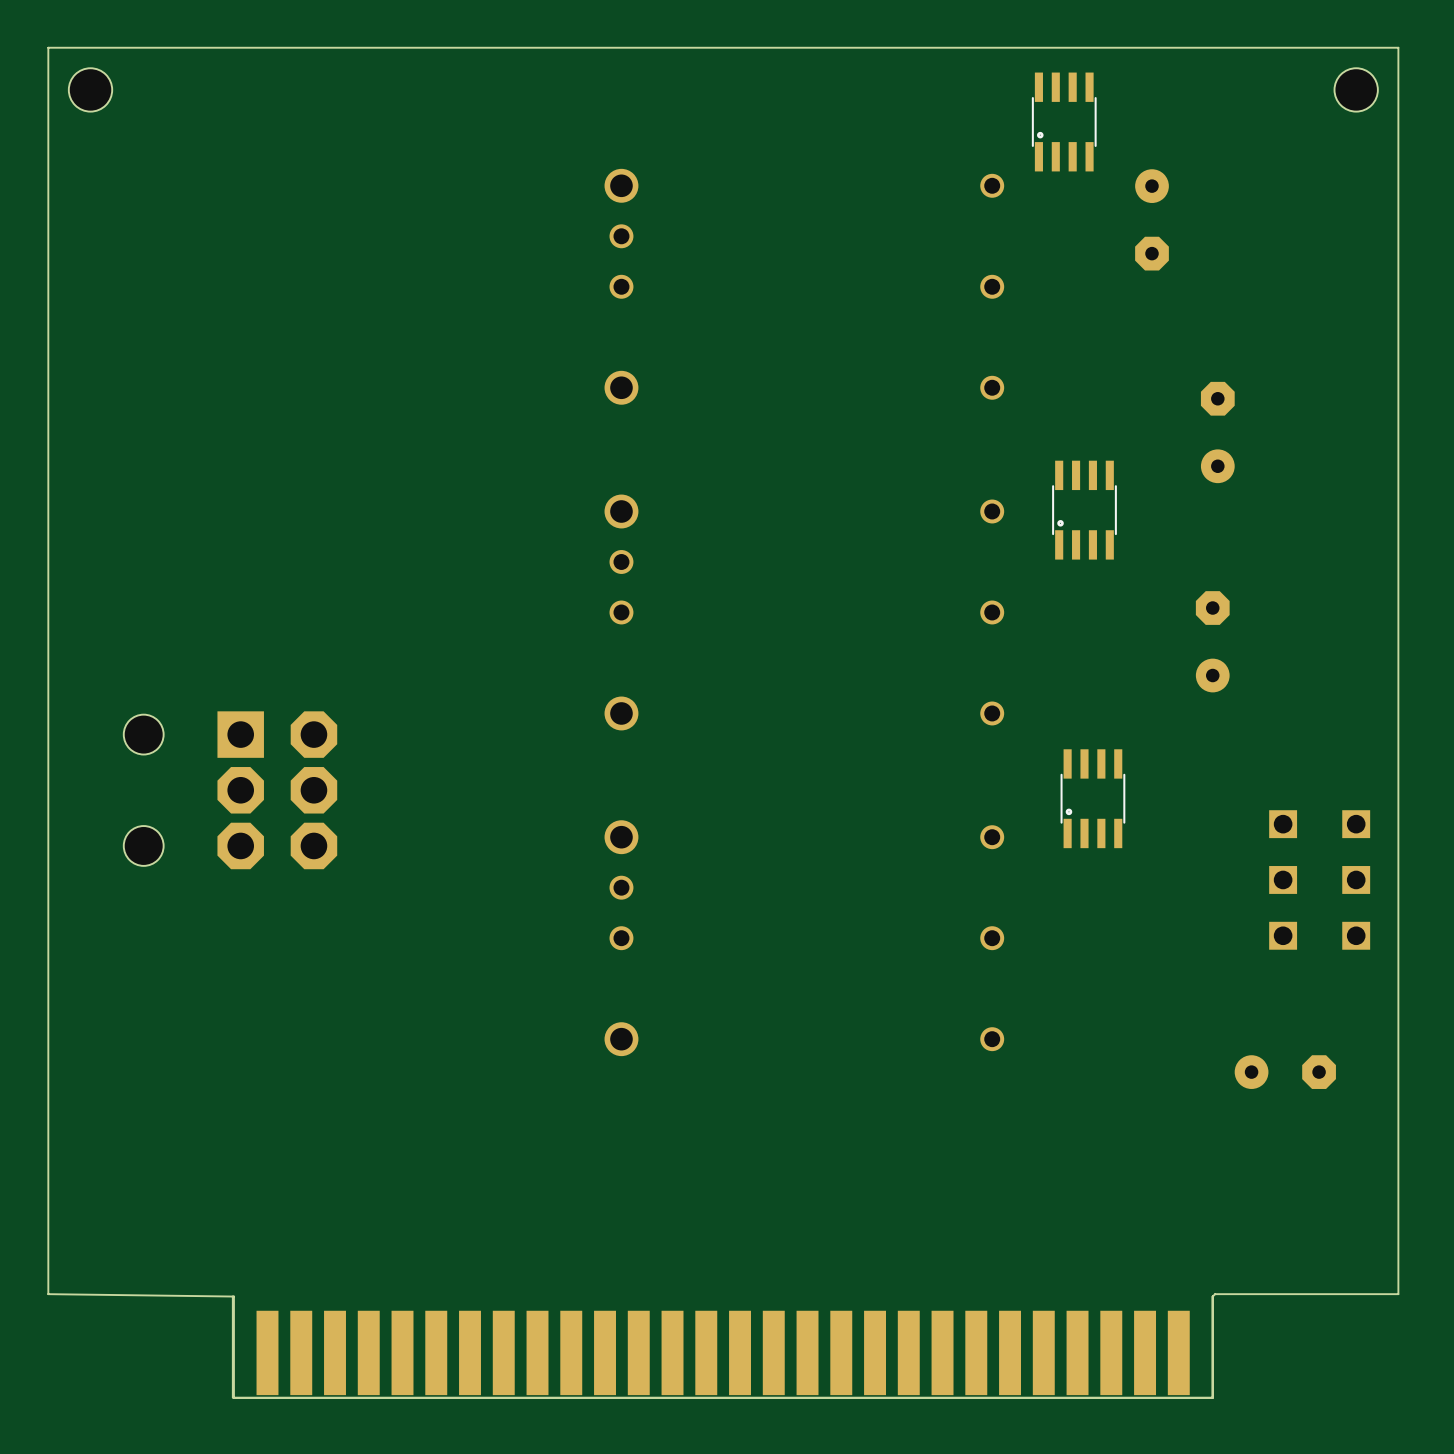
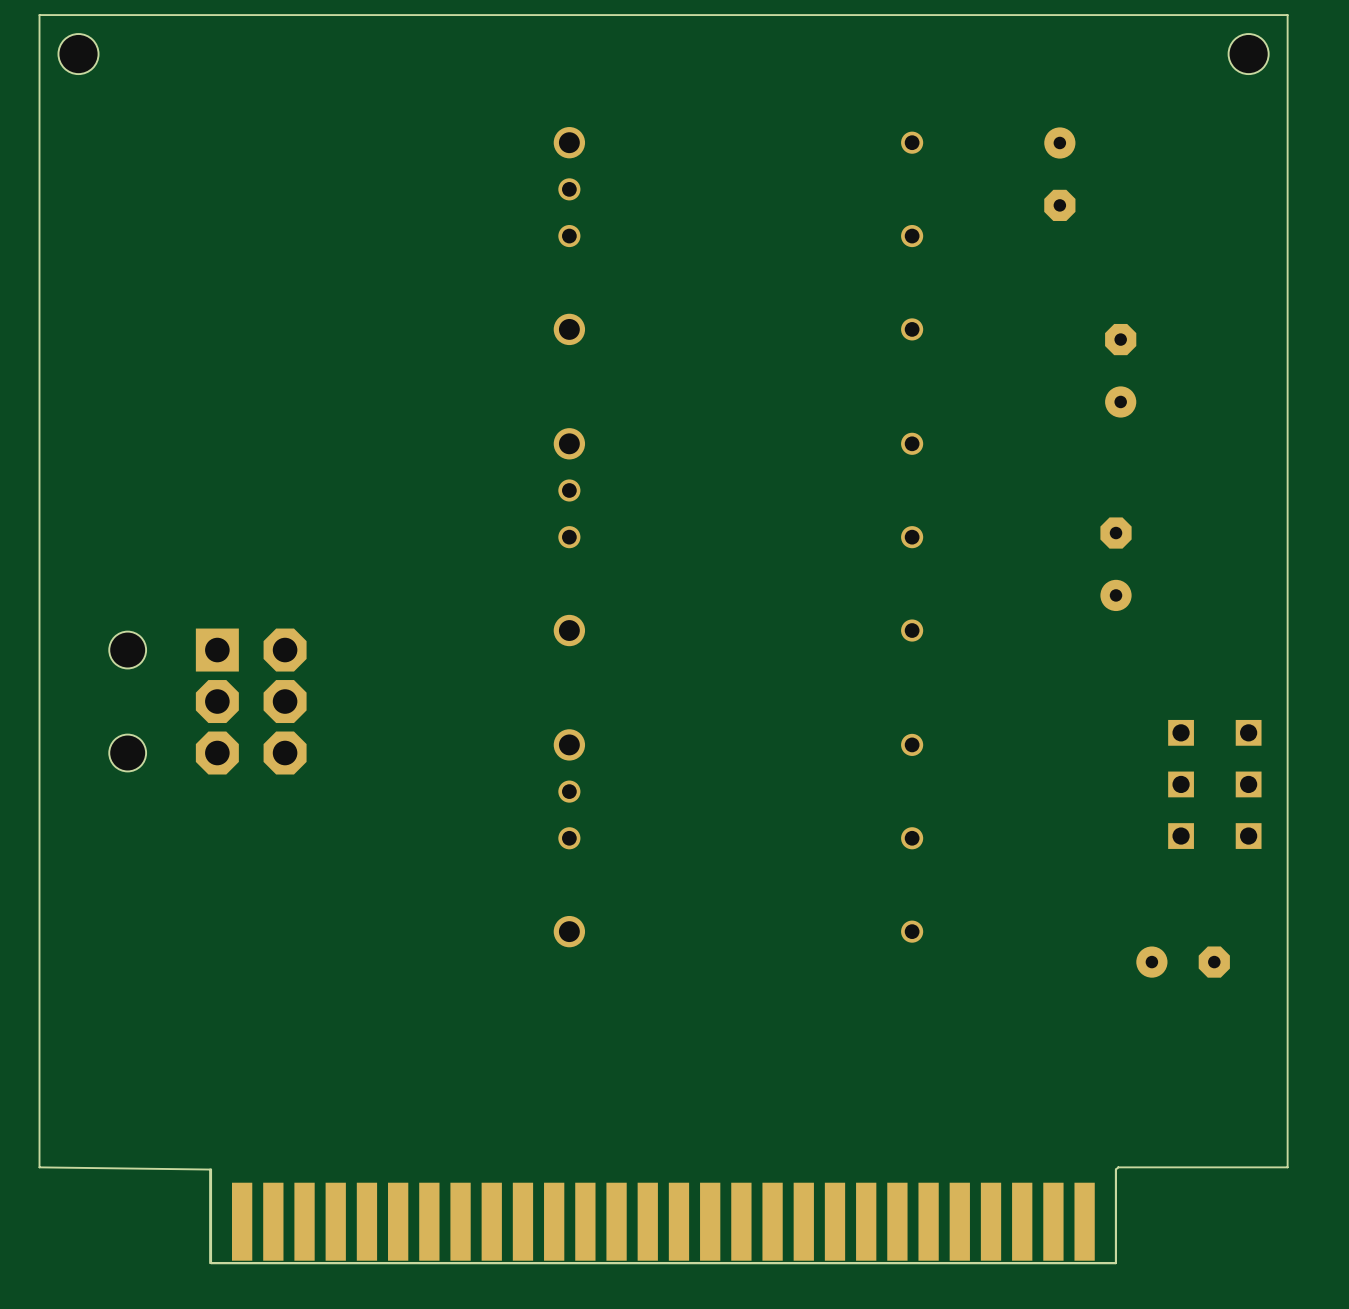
part: (1064, 121) -> none
part: (1084, 510) -> none
part: (1092, 798) -> none

